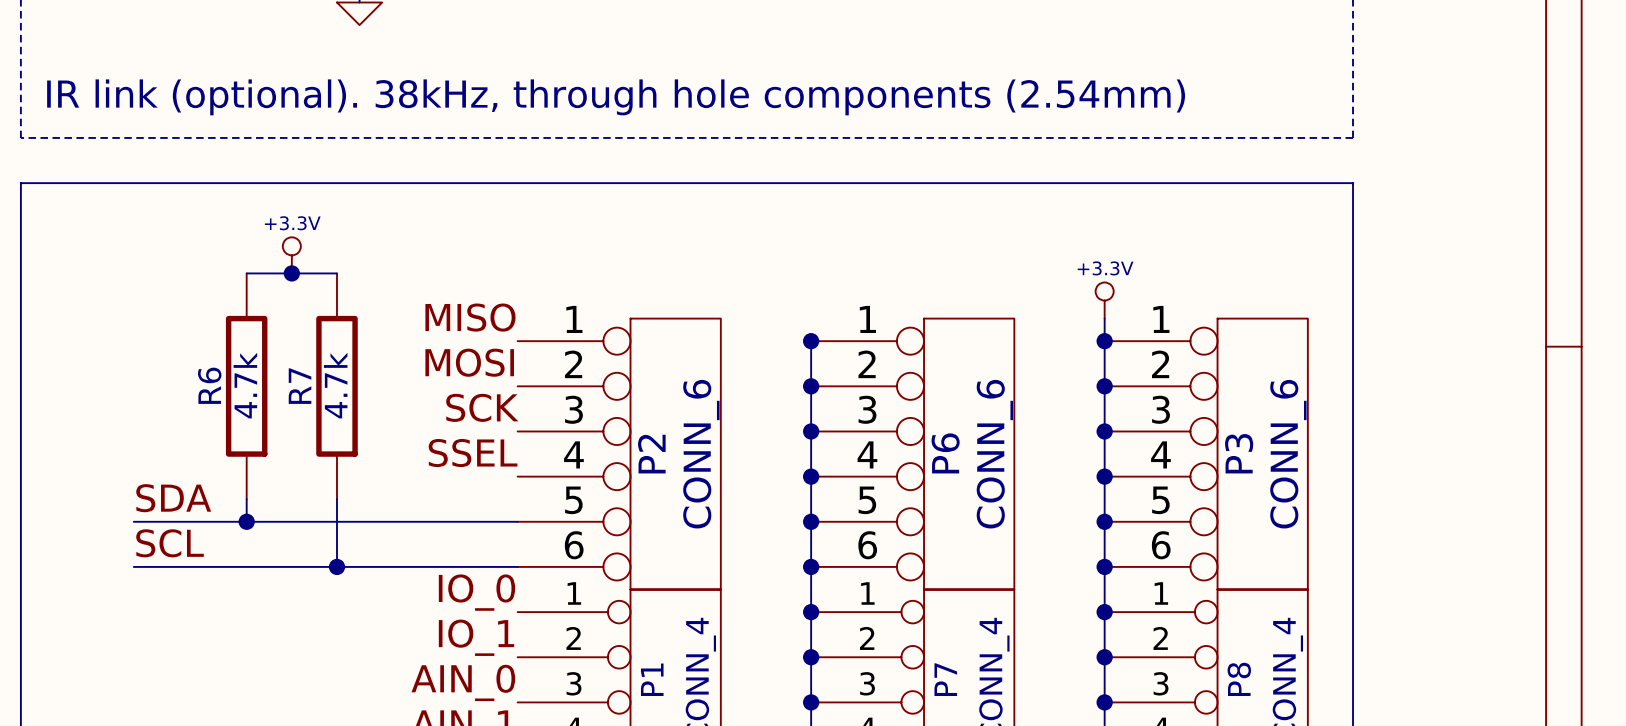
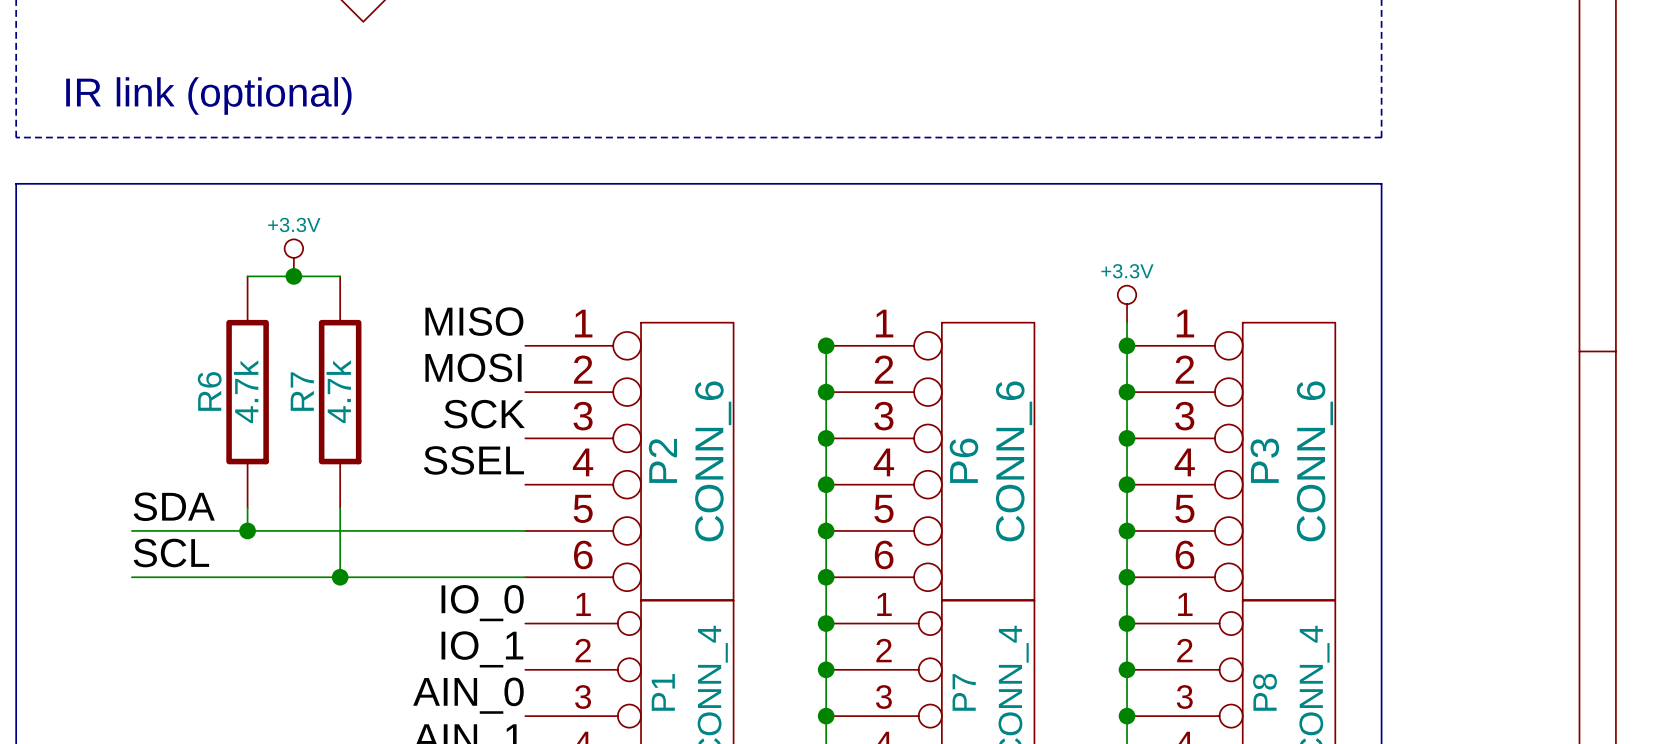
text: none -> IR link (optional) (208, 96)
text: IR link (optional). 38kHz, through hole components (2.54mm) (616, 97) -> none

